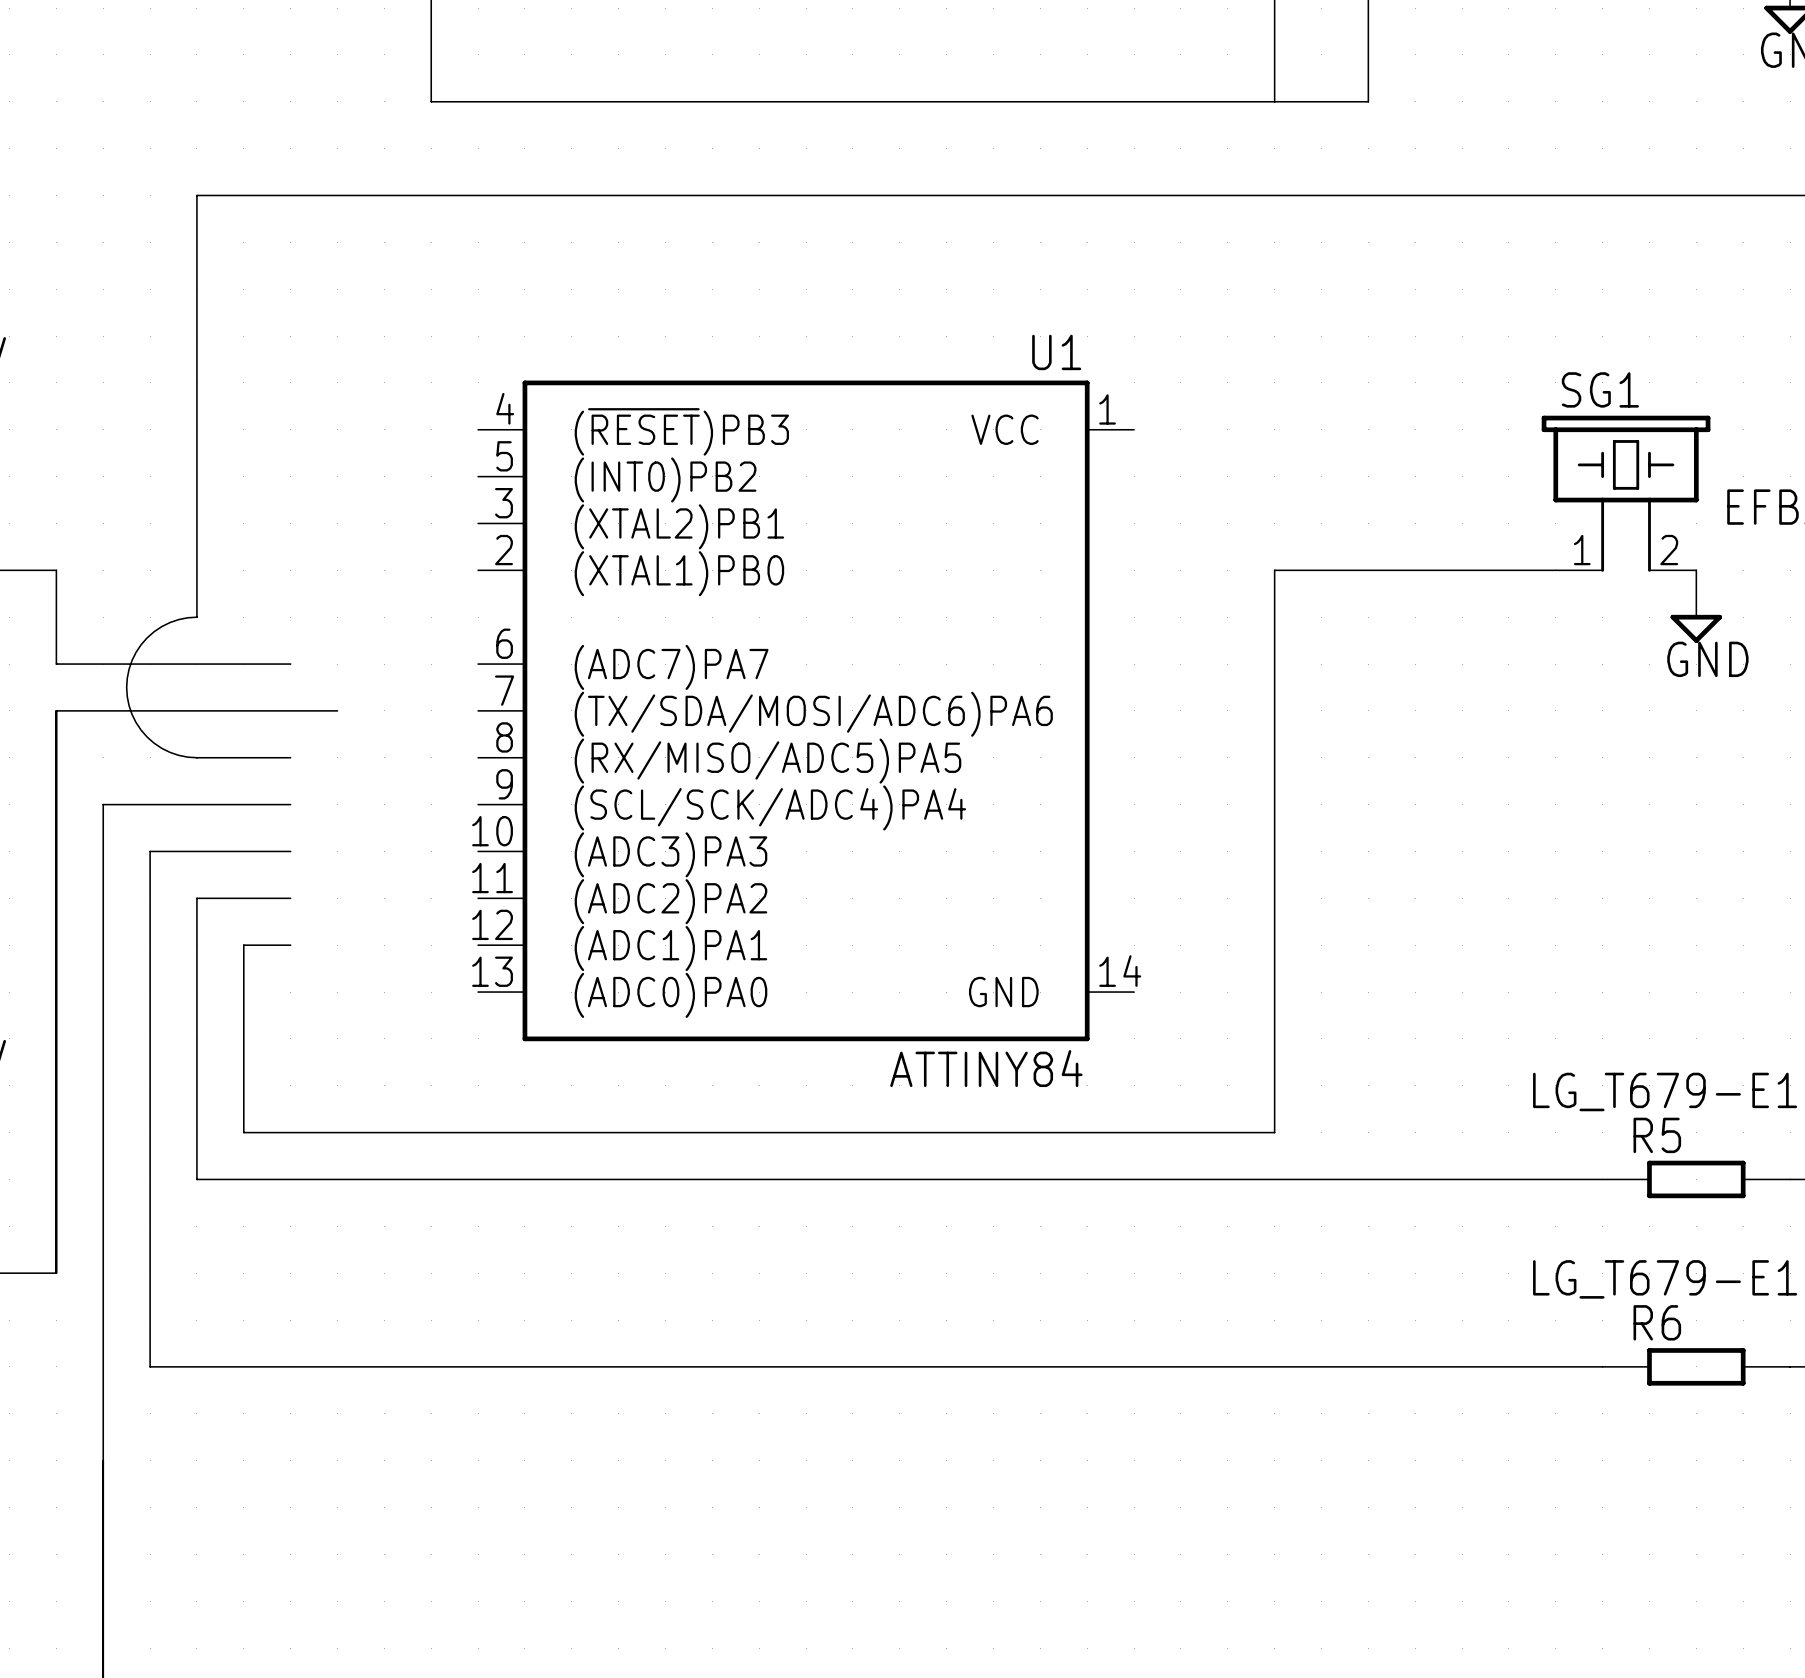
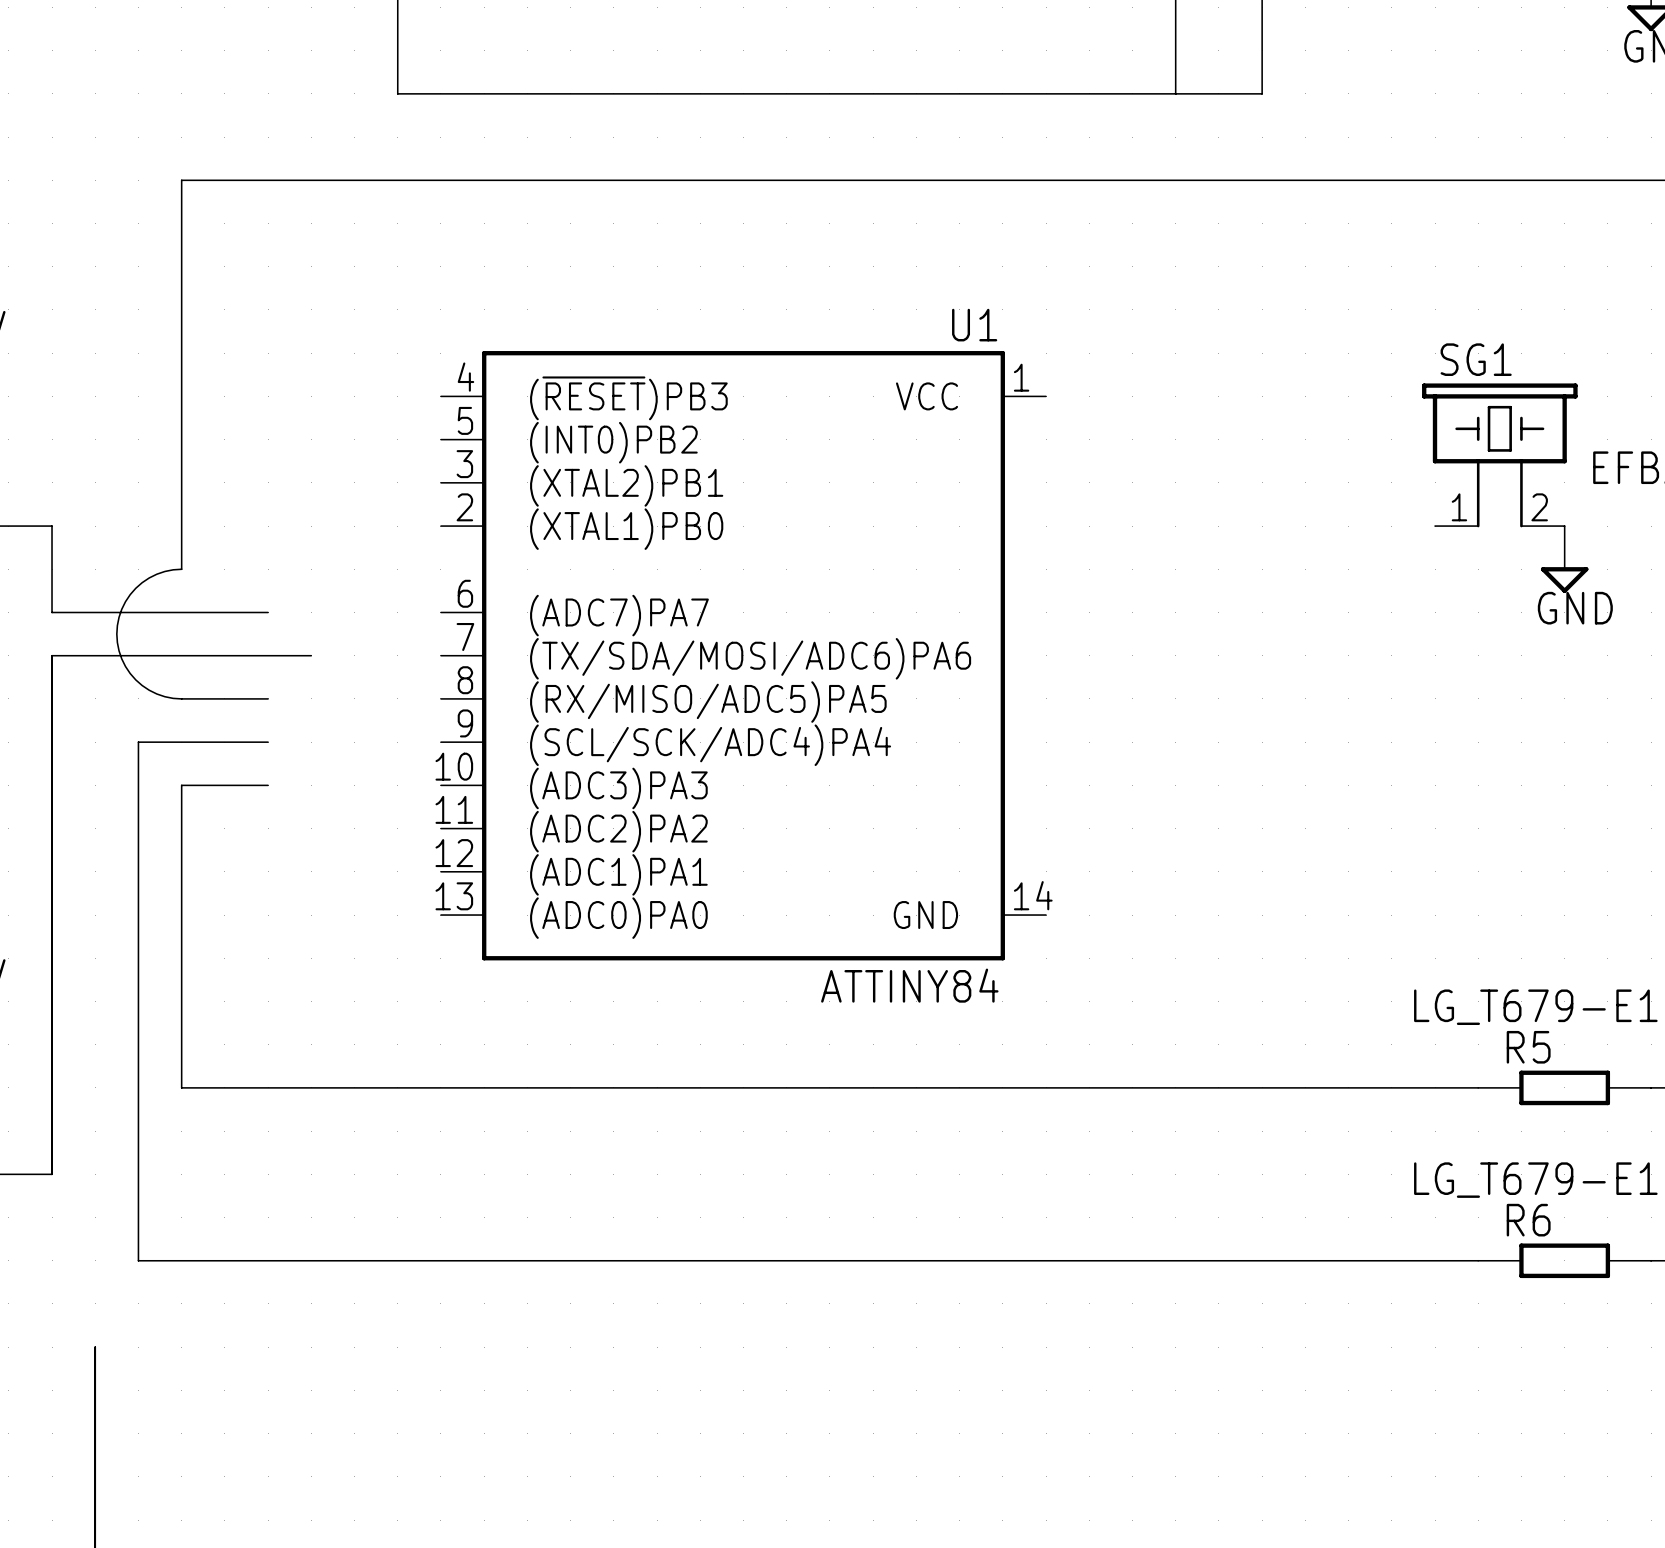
wire: (1555, 570) (1274, 570) (1274, 1132) (243, 1132) (243, 945) (290, 945) -> none
wire: (150, 804) (103, 804) (103, 1460) -> (138, 742) (138, 785)
wire: (150, 851) (196, 851) -> (181, 828) (181, 785)
wire: (196, 898) (290, 898) -> none

